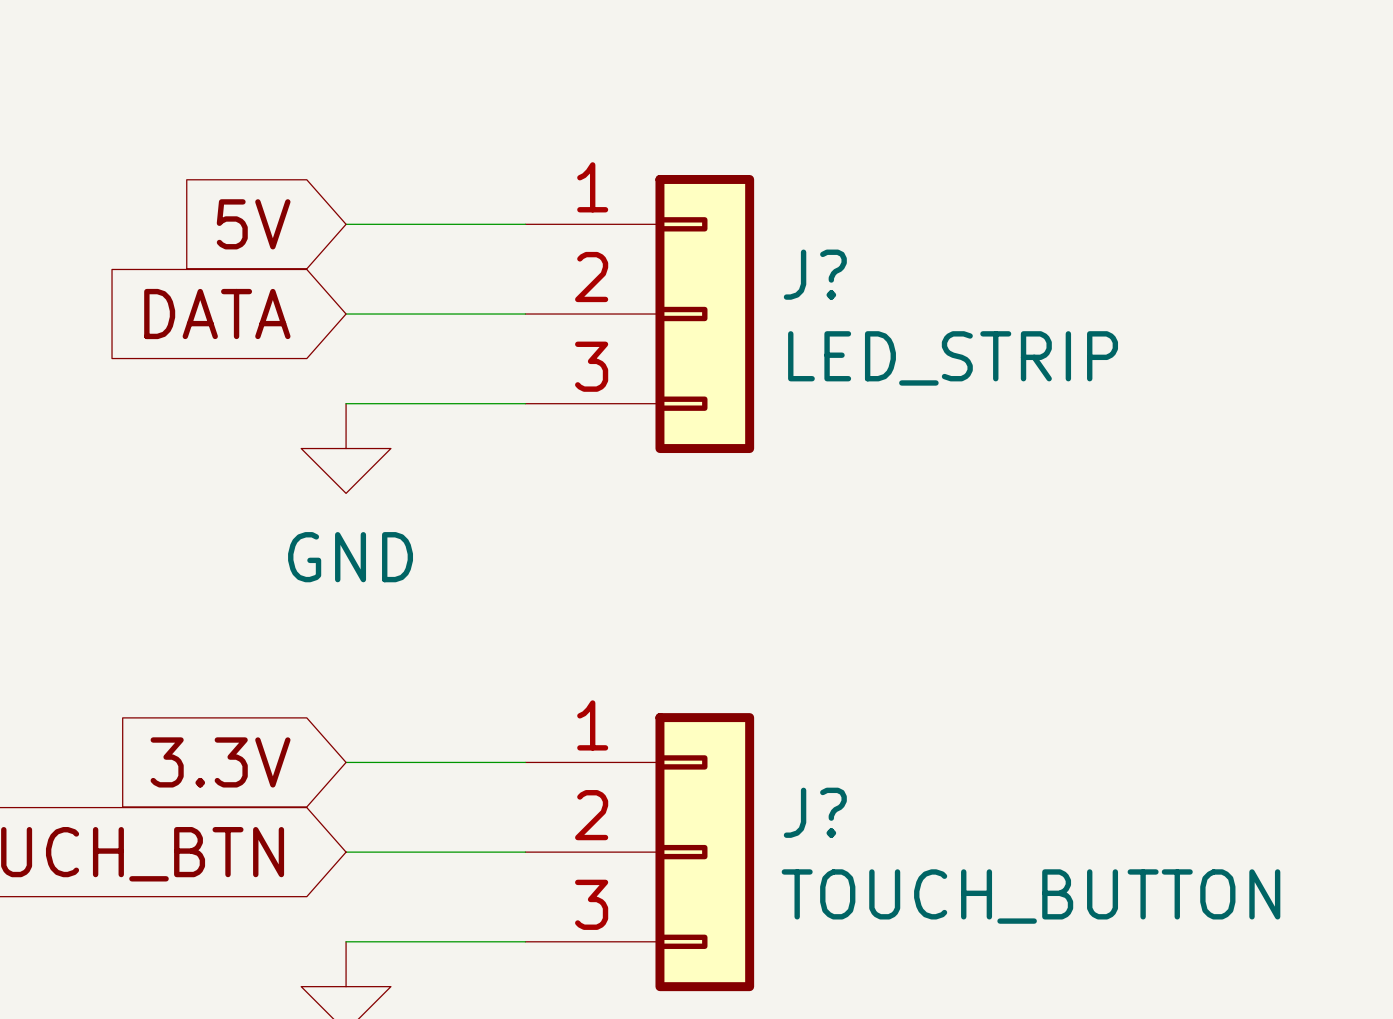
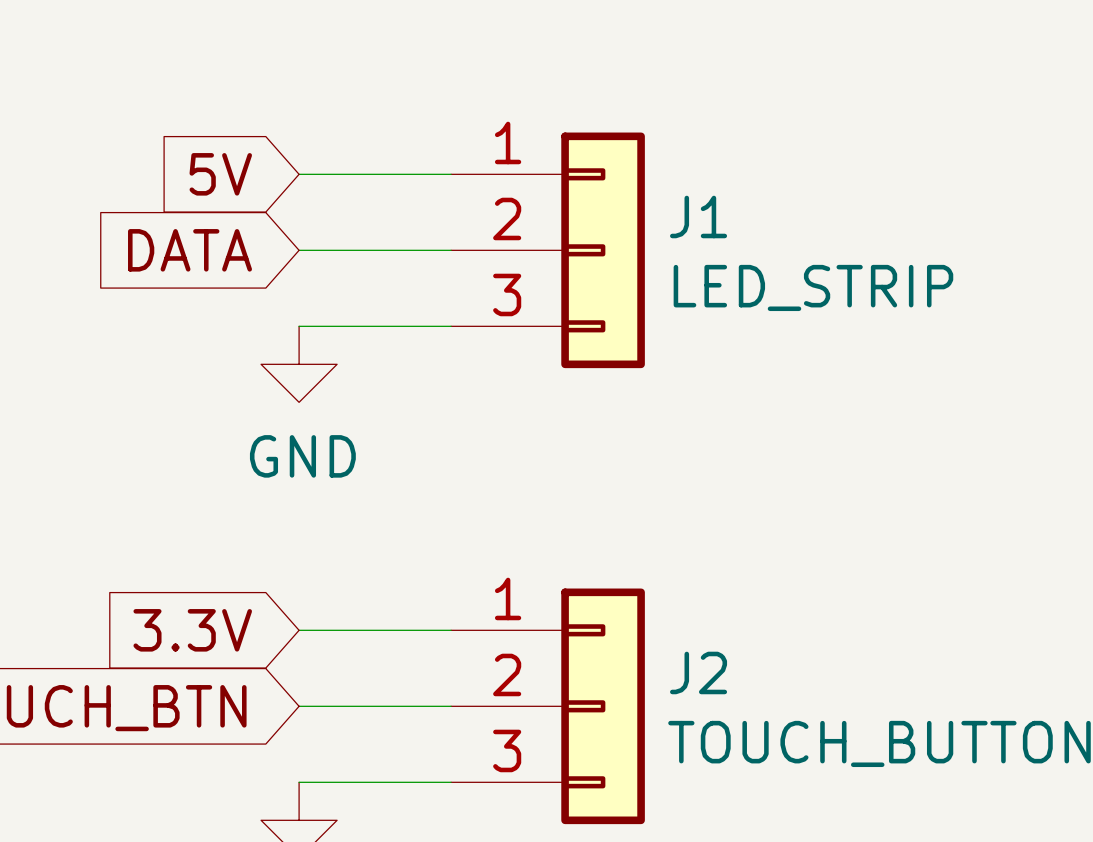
J? name: J? (815, 274) -> J1 (698, 216)
J? name: J? (815, 812) -> J2 (698, 672)

